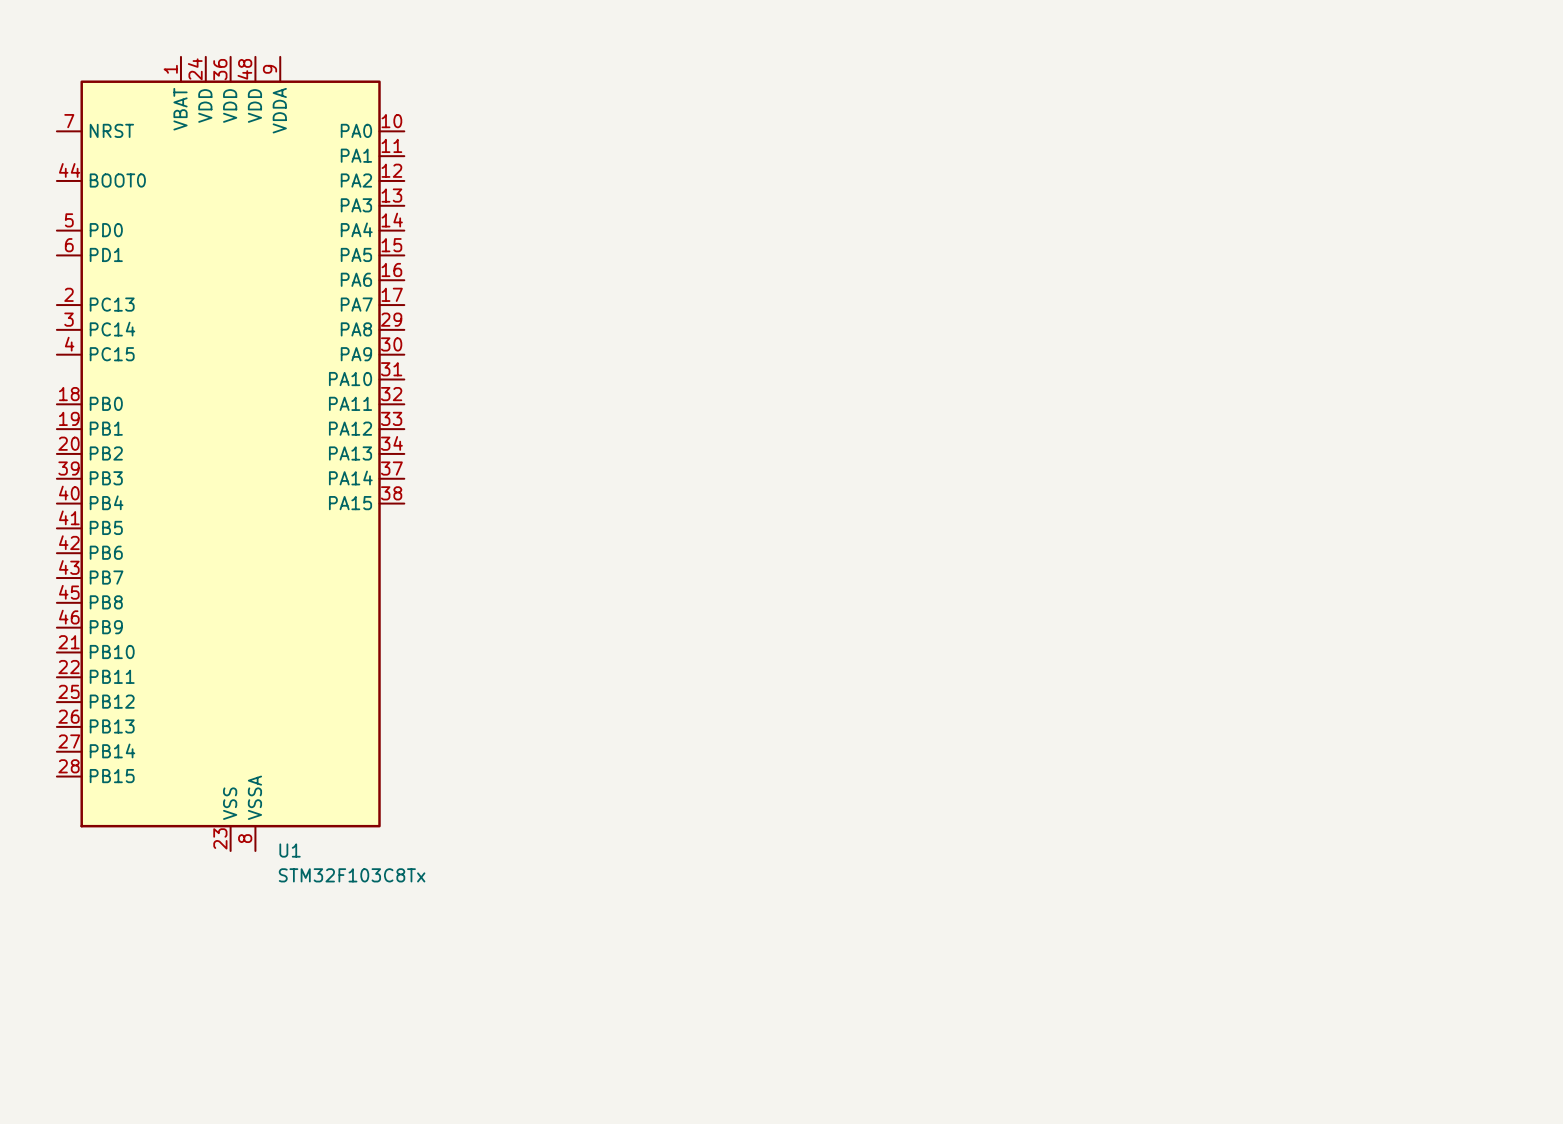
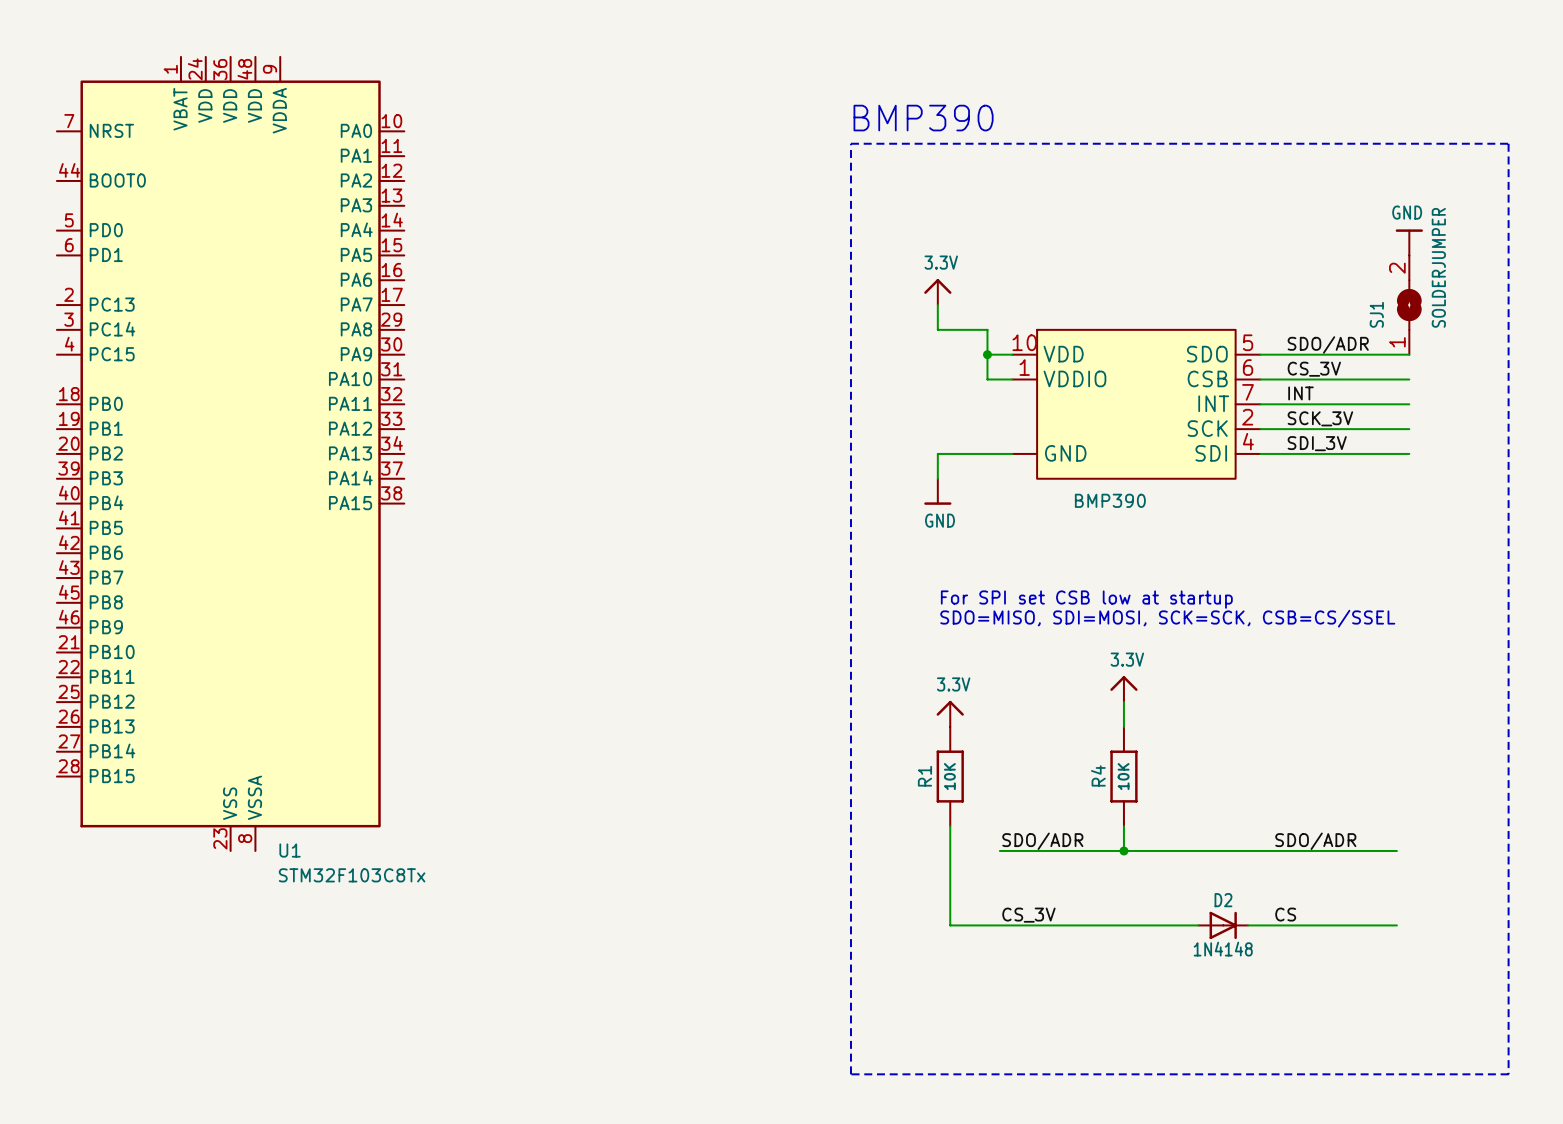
text: none -> BMP390 (923, 118)
line: none -> (850, 143) (1508, 143) (1508, 1074) (850, 1074) (850, 143)
power symbol: none -> GND (1409, 242)
power symbol: none -> 3.3V (937, 292)
wire: none -> (937, 305) (937, 329) (987, 329) (987, 379) (1012, 379)
SJ1: none -> SOLDERJUMPER (1409, 305)
label: none -> SDO/ADR (1328, 344)
wire: none -> (987, 354) (1012, 354)
junction: none -> (987, 354)
wire: none -> (1260, 354) (1409, 354)
label: none -> CS_3V (1314, 369)
wire: none -> (1260, 379) (1409, 379)
label: none -> INT (1301, 393)
part: none -> BMP390 (1136, 404)
wire: none -> (1260, 404) (1409, 404)
label: none -> SCK_3V (1320, 418)
wire: none -> (1260, 429) (1409, 429)
label: none -> SDI_3V (1317, 443)
wire: none -> (1012, 453) (937, 453) (937, 478)
wire: none -> (1260, 453) (1409, 453)
power symbol: none -> GND (937, 491)
text: none -> For SPI set CSB low at startup (1086, 599)
text: none -> SDO=MISO, SDI=MOSI, SCK=SCK, CSB=CS/SSEL (1167, 618)
power symbol: none -> 3.3V (1123, 689)
wire: none -> (1123, 702) (1123, 726)
power symbol: none -> 3.3V (950, 713)
R1: none -> 10K (950, 776)
R4: none -> 10K (1123, 776)
wire: none -> (950, 826) (950, 925) (1198, 925)
wire: none -> (1123, 826) (1123, 850)
label: none -> SDO/ADR (1042, 841)
label: none -> SDO/ADR (1315, 841)
wire: none -> (999, 850) (1396, 850)
junction: none -> (1123, 850)
label: none -> CS (1285, 914)
label: none -> CS_3V (1028, 915)
D2: none -> 1N4148 (1223, 925)
wire: none -> (1248, 925) (1396, 925)

